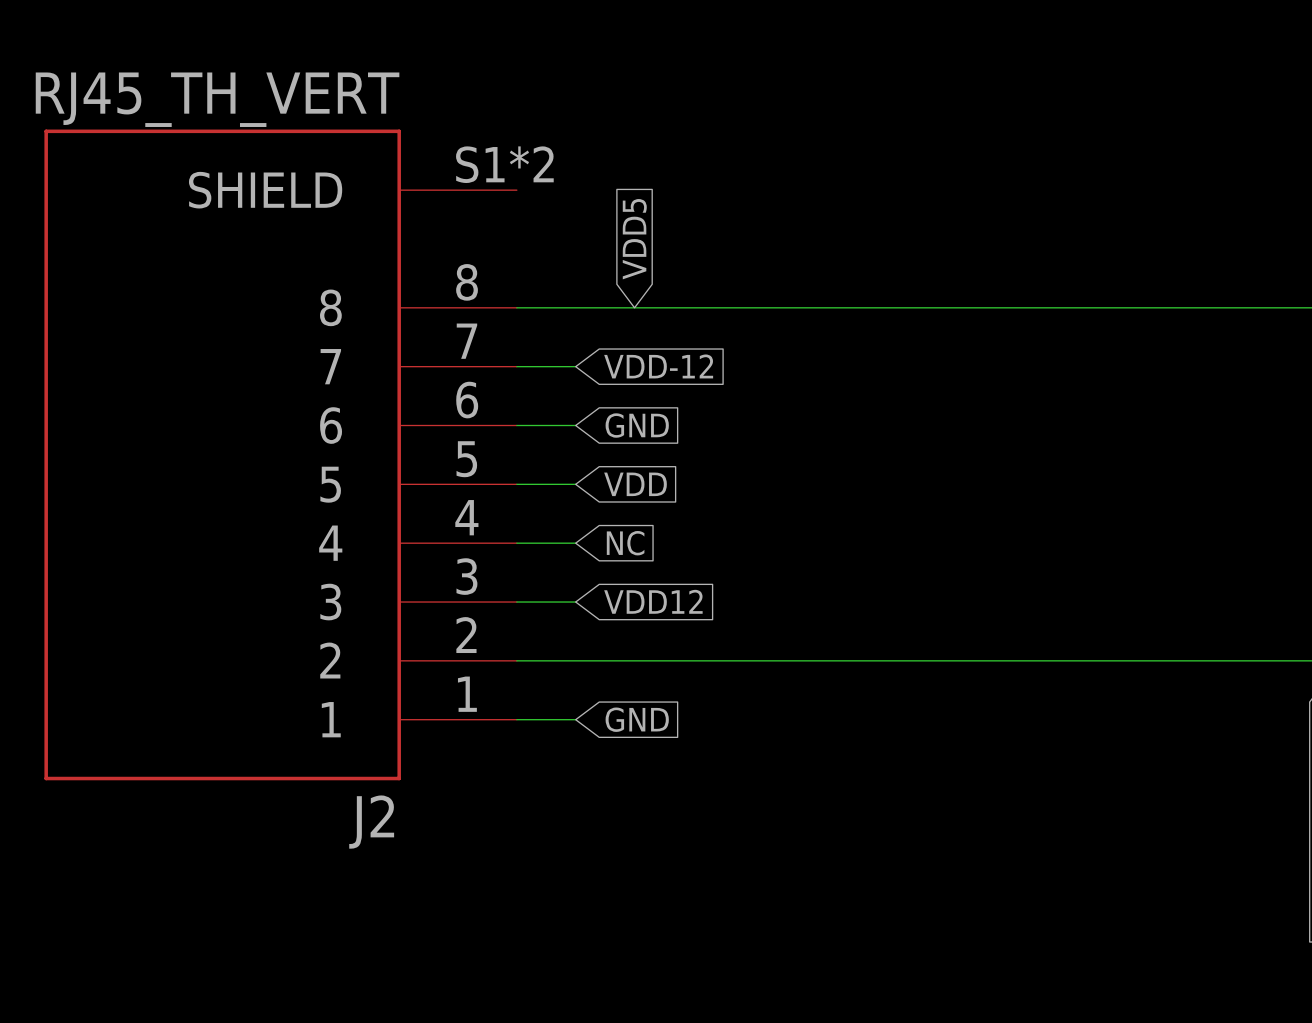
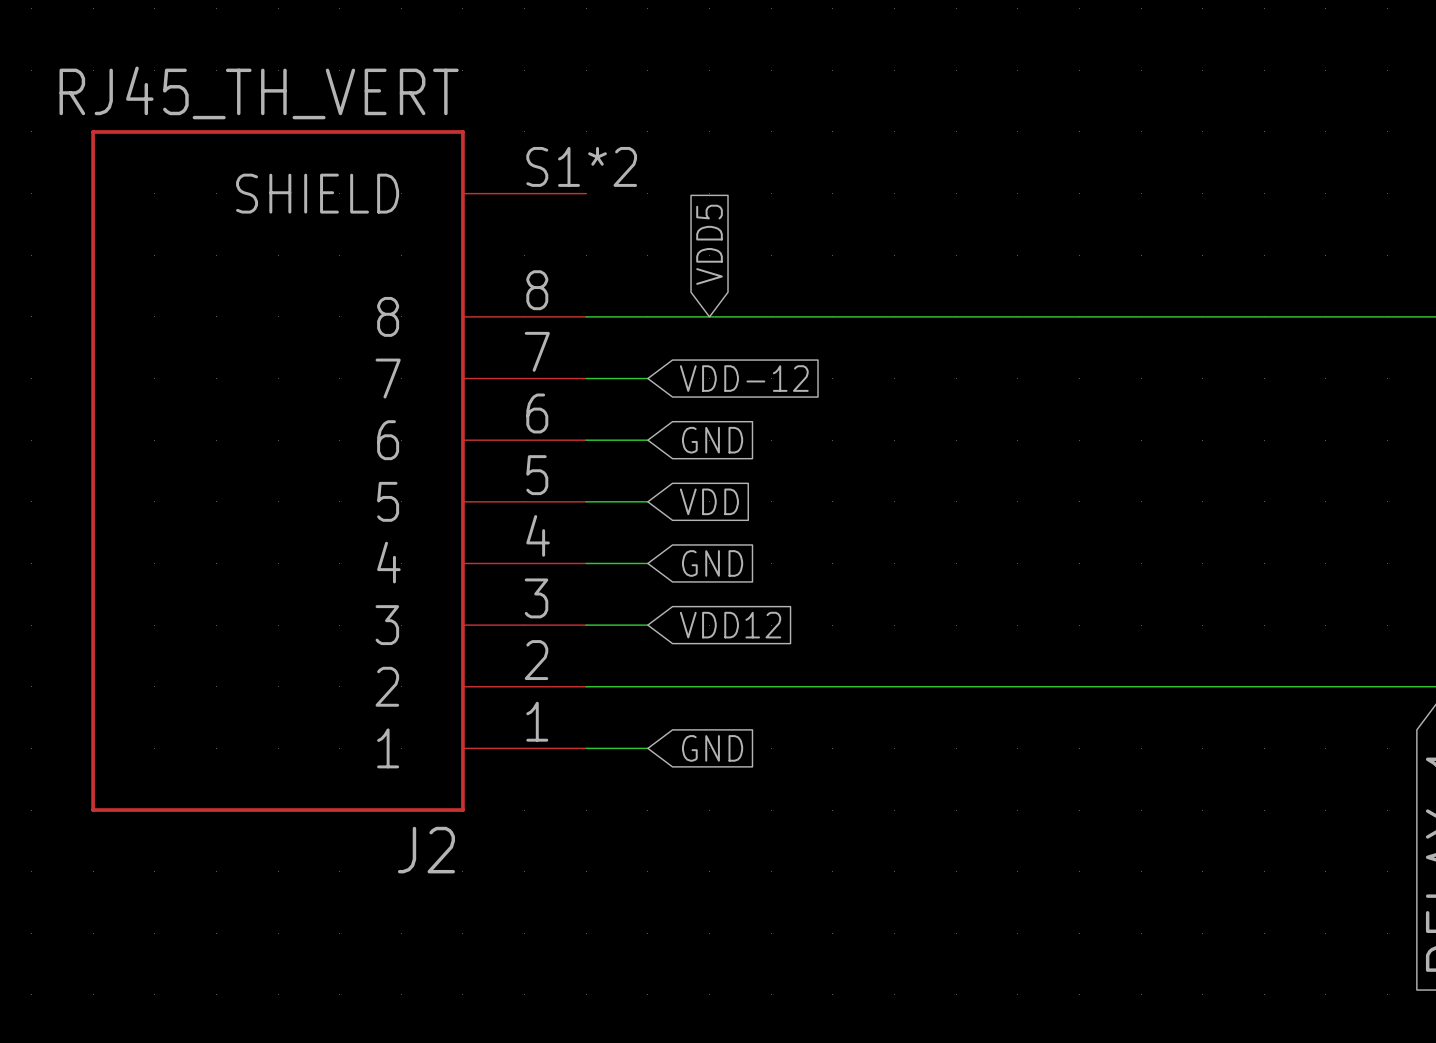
global label: NC (625, 543) -> GND (712, 563)

